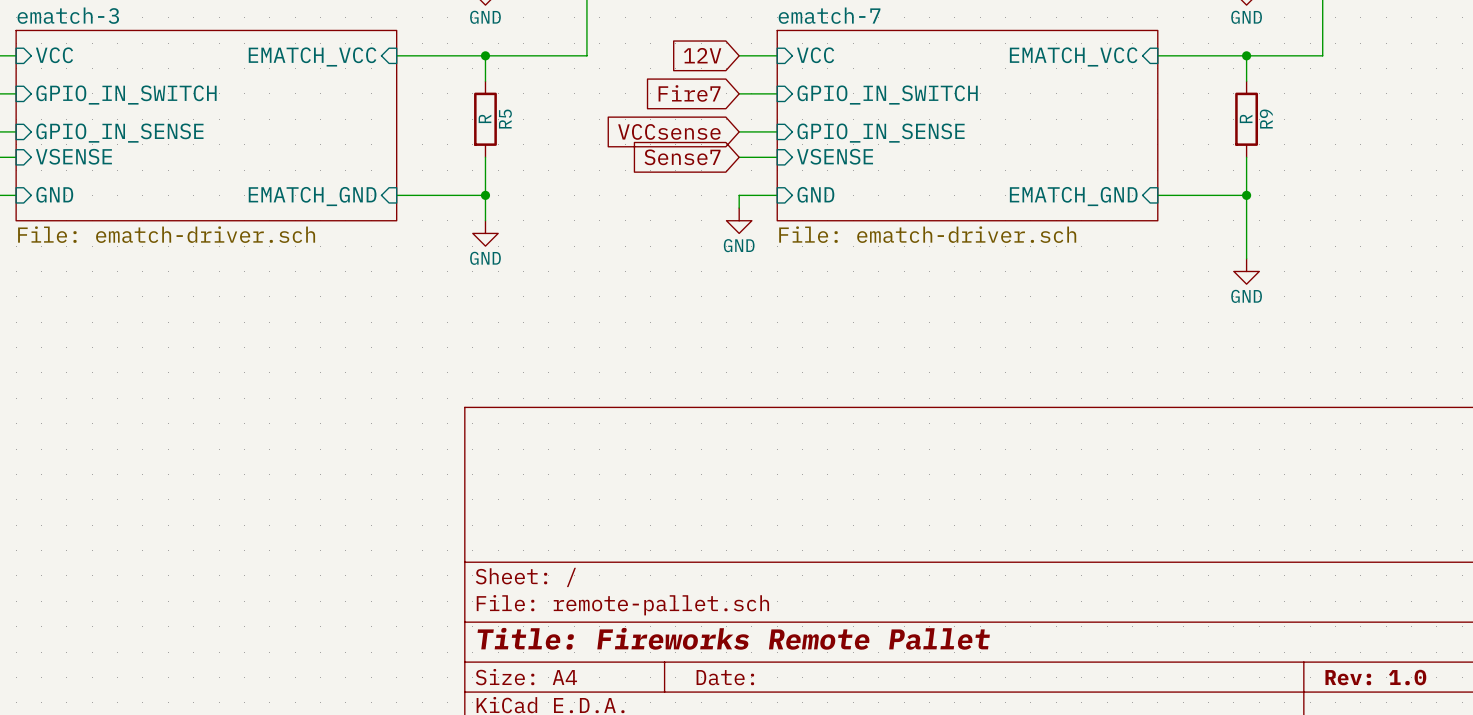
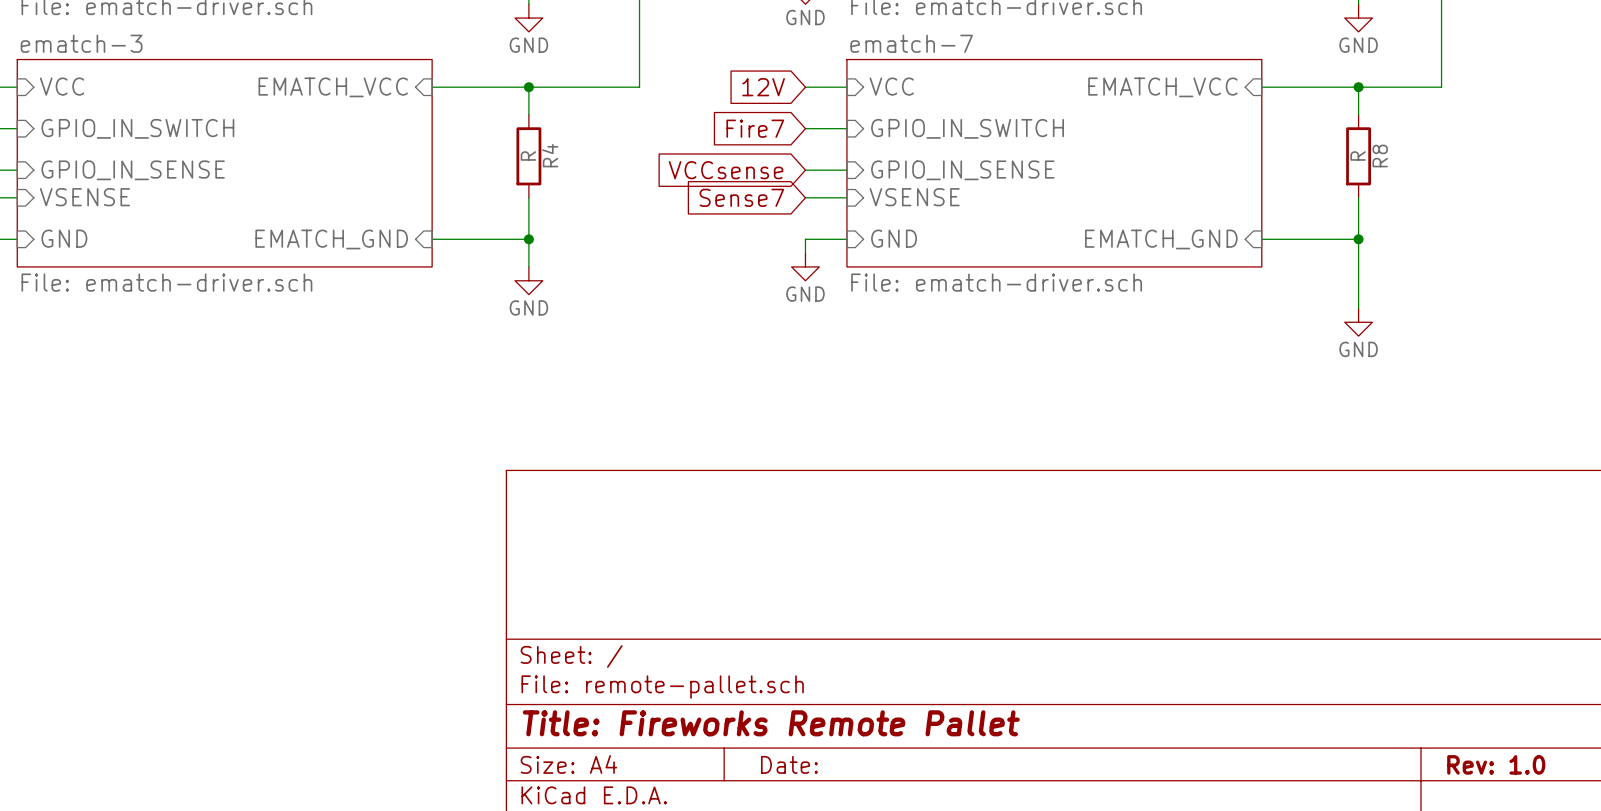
R5 name: R5 (505, 119) -> R4 (550, 155)
R9 name: R9 (1266, 119) -> R8 (1380, 156)

